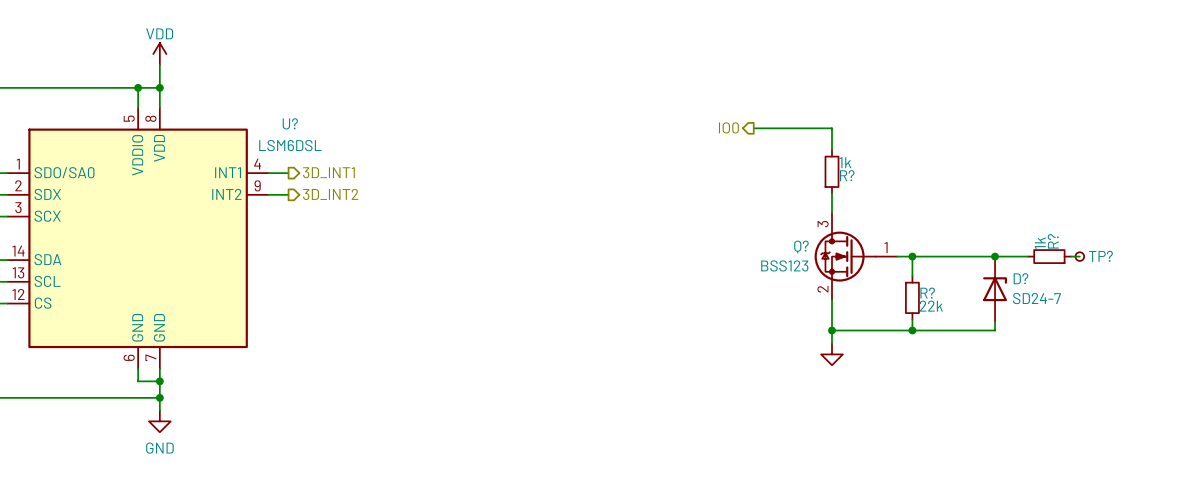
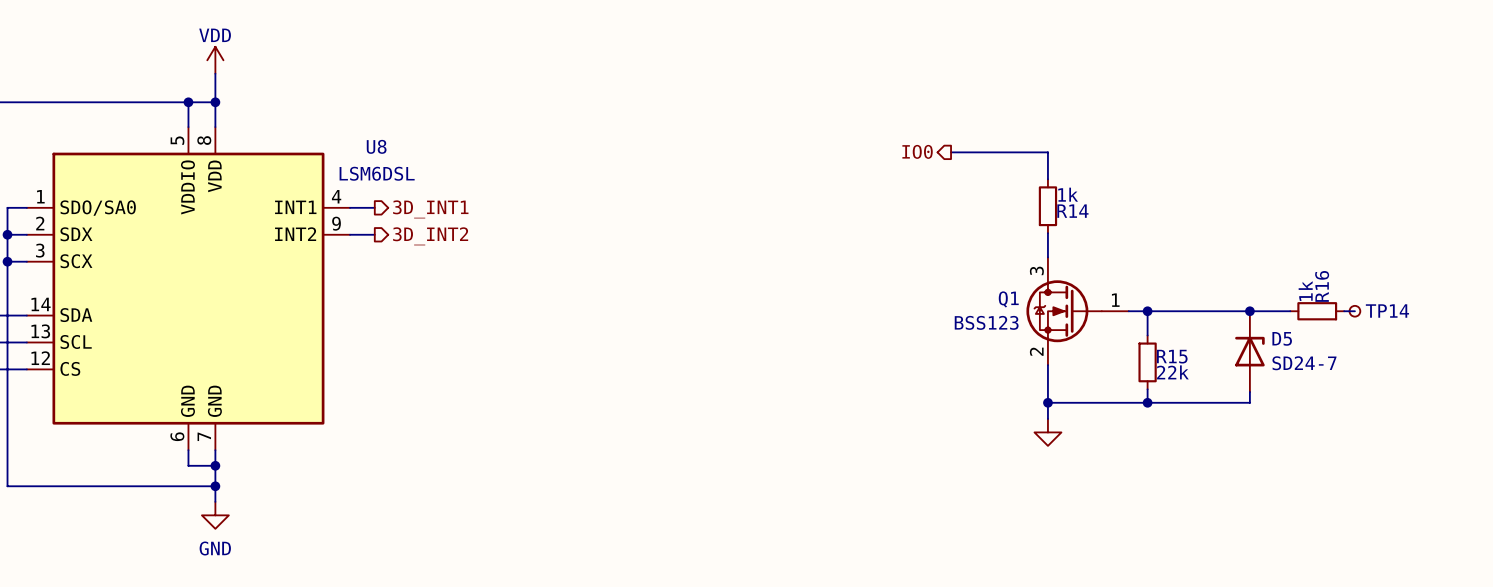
U? name: U? (290, 123) -> U8 (376, 146)
R? name: R? (847, 175) -> R14 (1072, 211)
R? name: R? (1053, 241) -> R16 (1322, 286)
Q? name: Q? (801, 247) -> Q1 (1008, 299)
TP? name: TP? (1100, 256) -> TP14 (1387, 311)
D? name: D? (1020, 278) -> D5 (1282, 338)
R? name: R? (927, 293) -> R15 (1172, 356)

